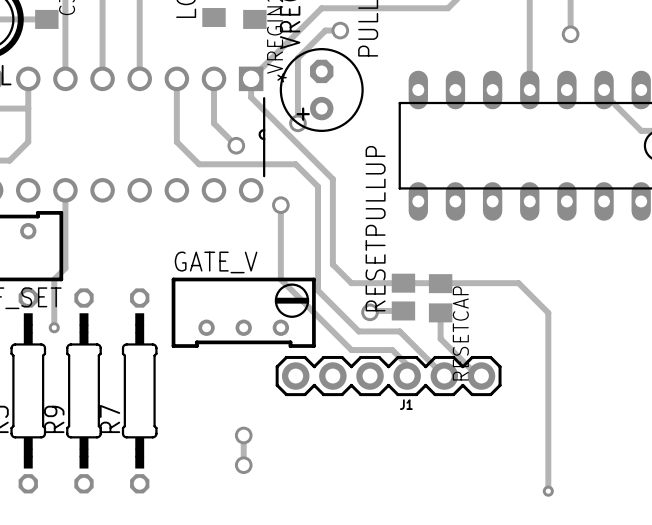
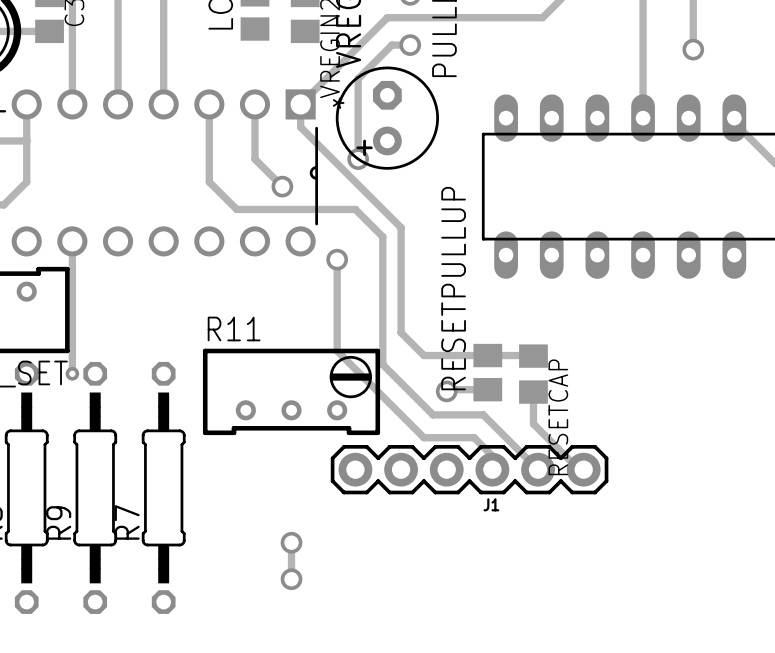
GATE_V name: GATE_V (216, 262) -> R11 (234, 328)
track: (65, 268) (54, 279) (54, 327) -> (72, 337) (72, 373)
track: (440, 283) (518, 283) (548, 312) (548, 491) -> none
via position: (54, 327) -> (72, 373)
via: (548, 491) -> none

